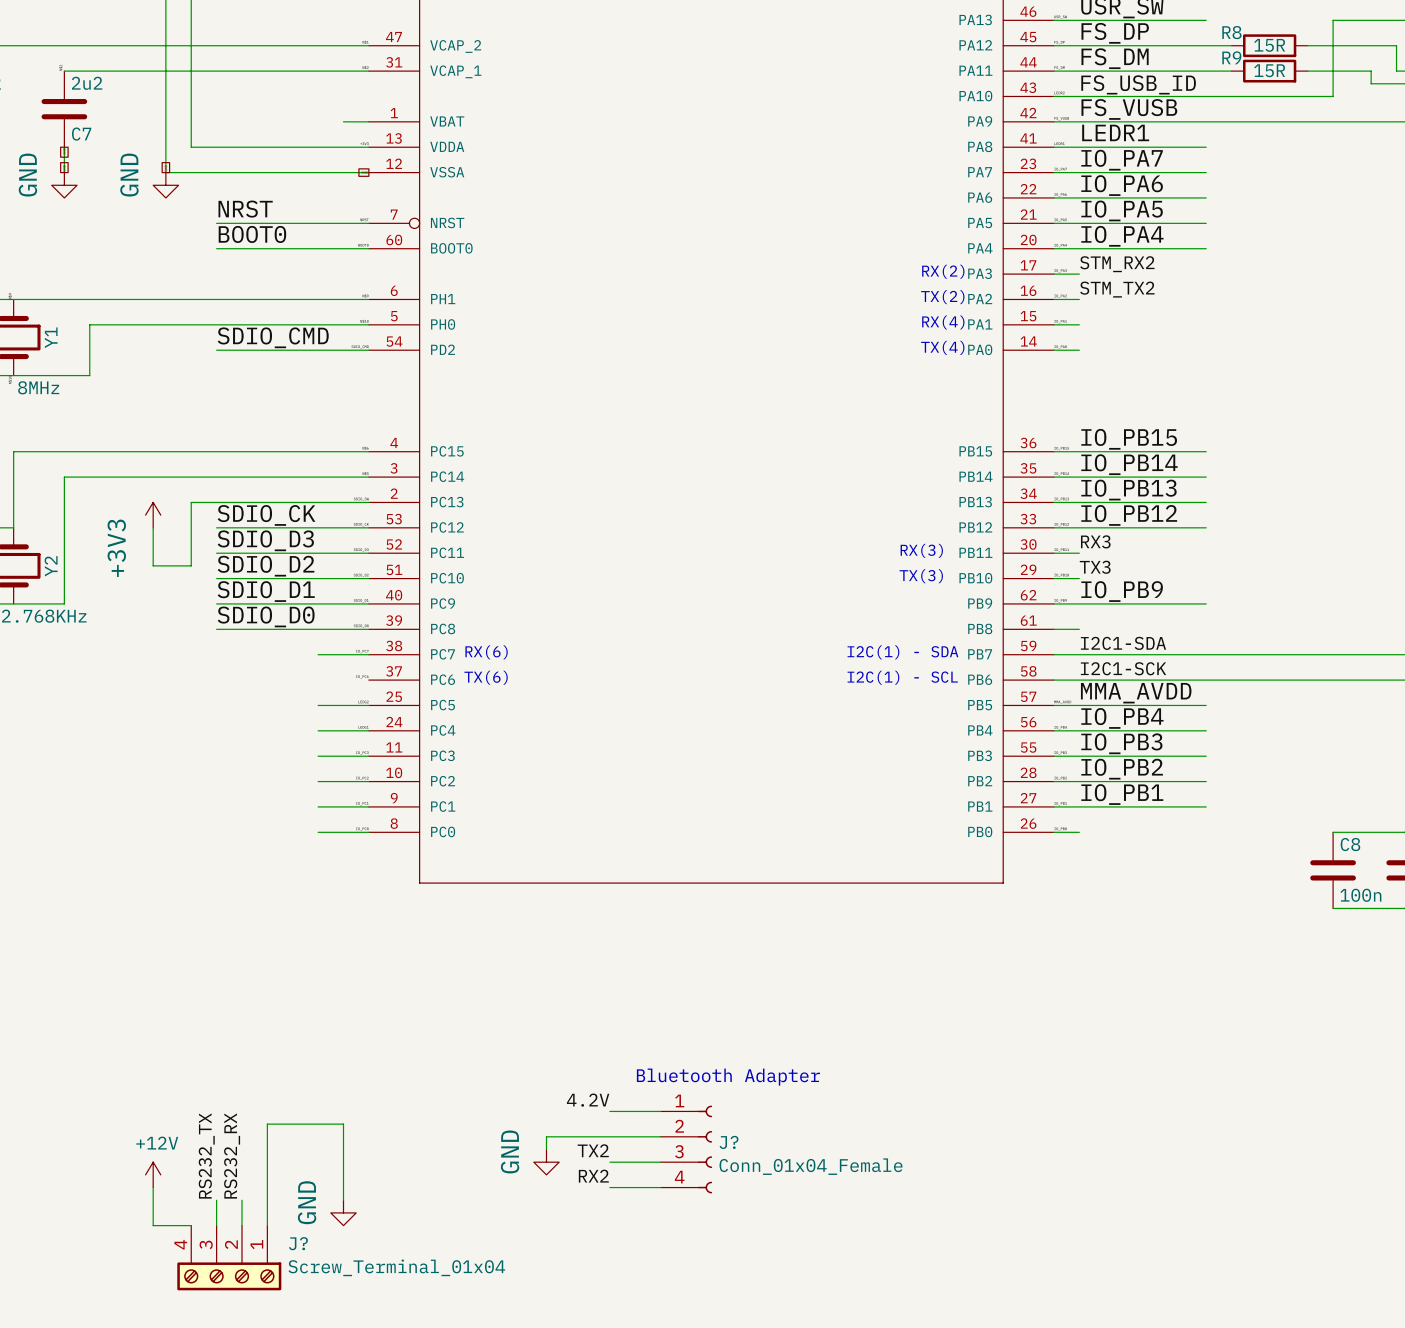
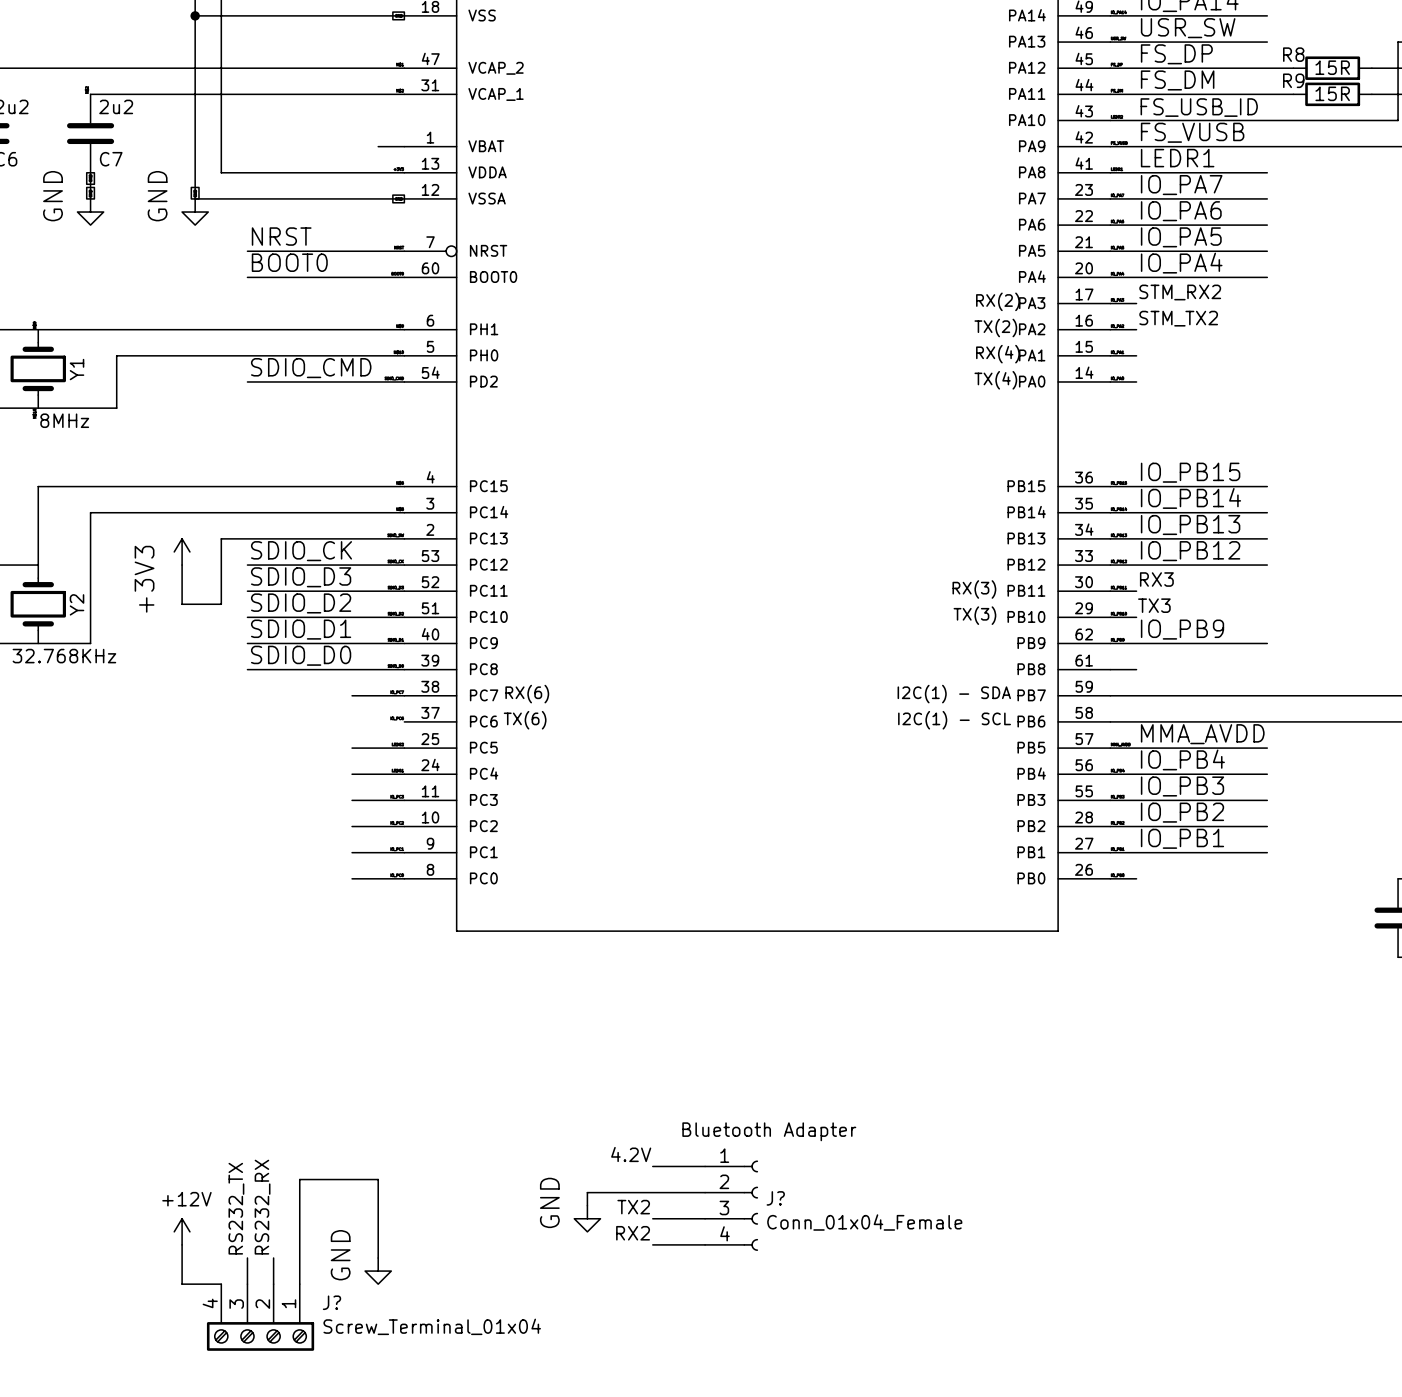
label: I2C1-SDA (1123, 643) -> none
label: I2C1-SCK (1123, 668) -> none

